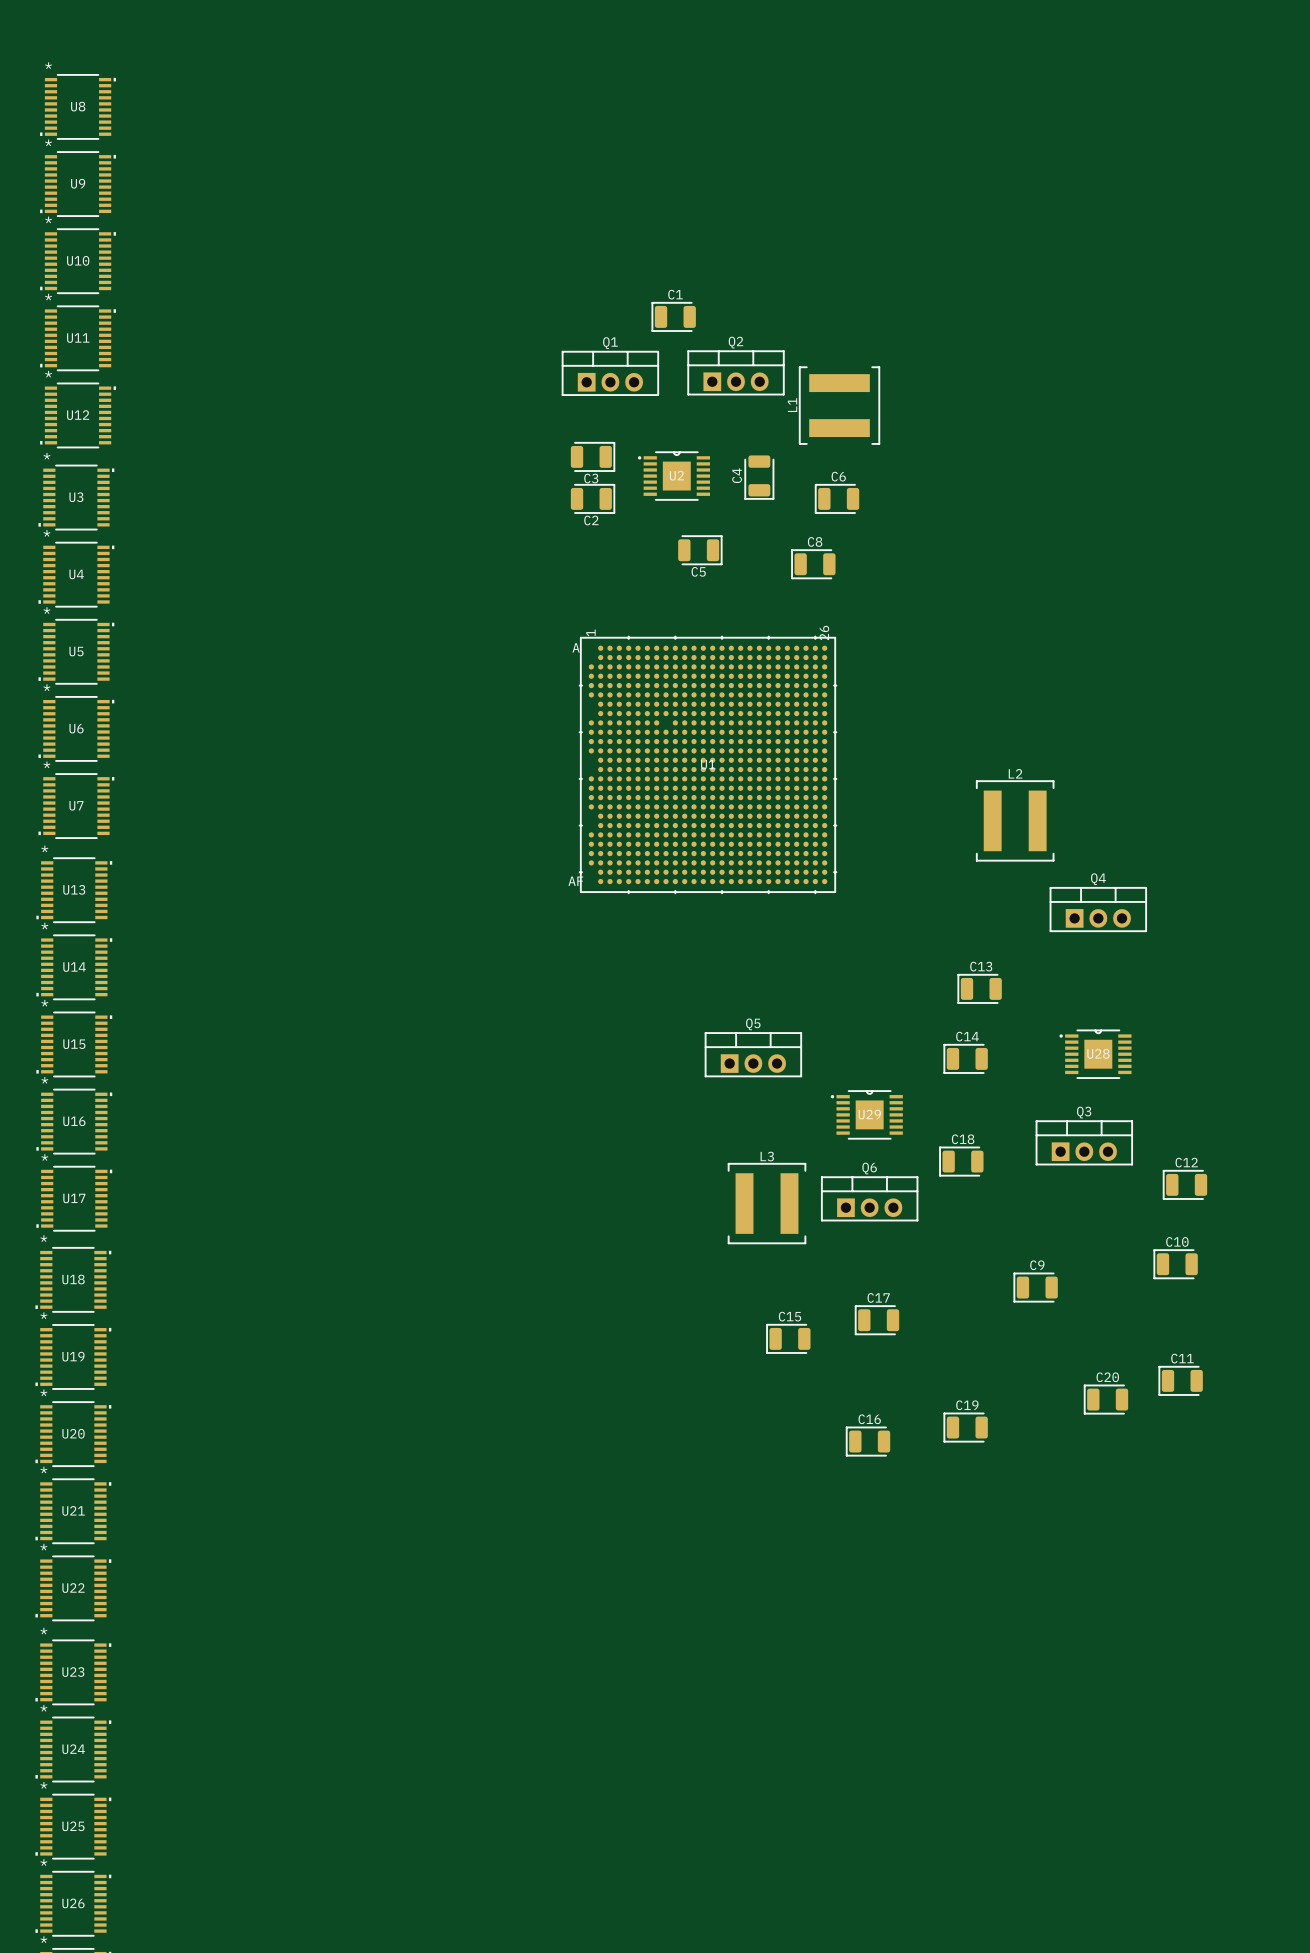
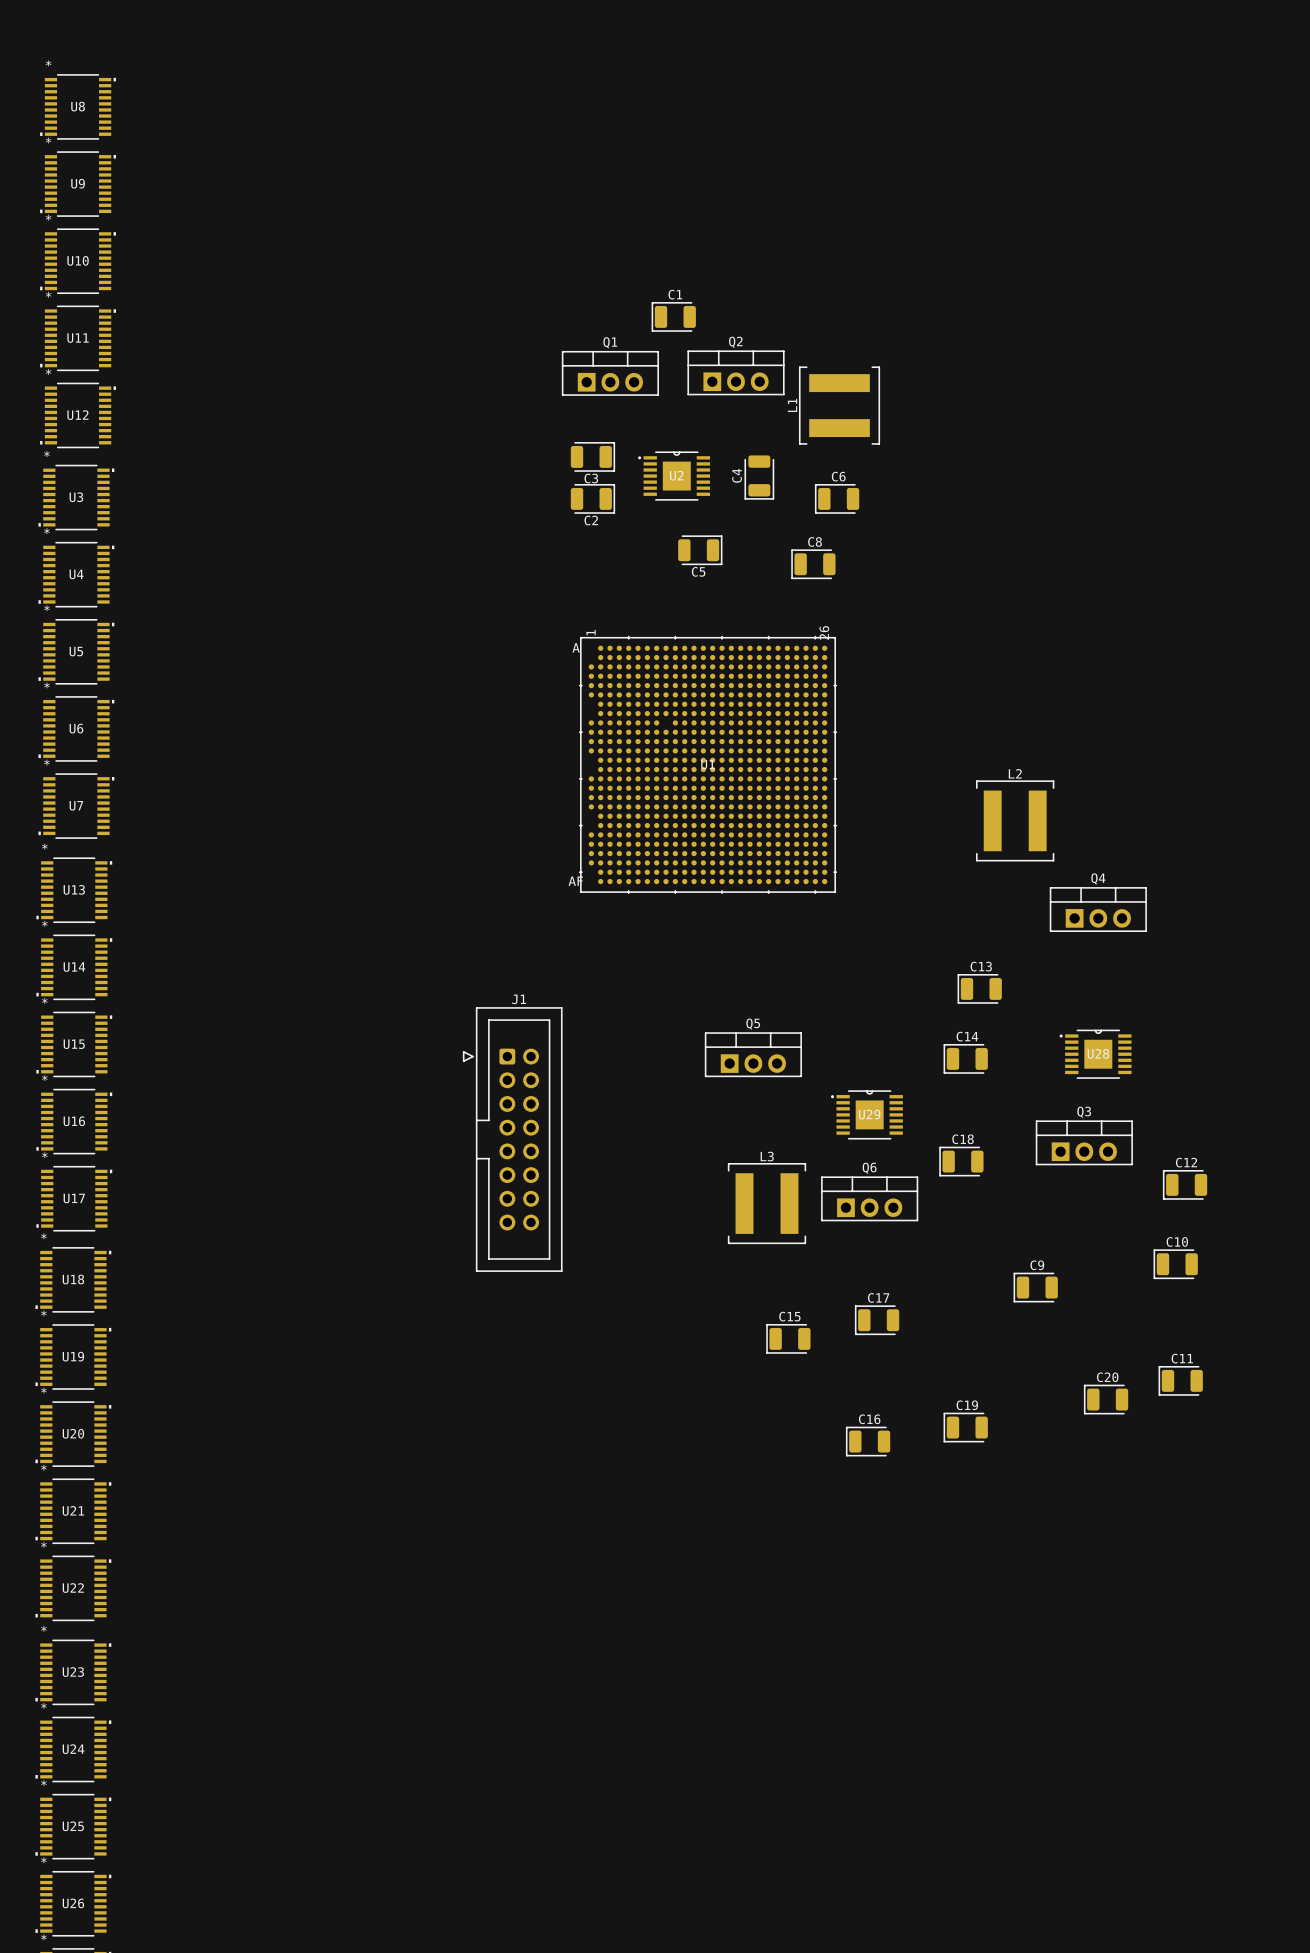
J1: none -> (512, 1139)

